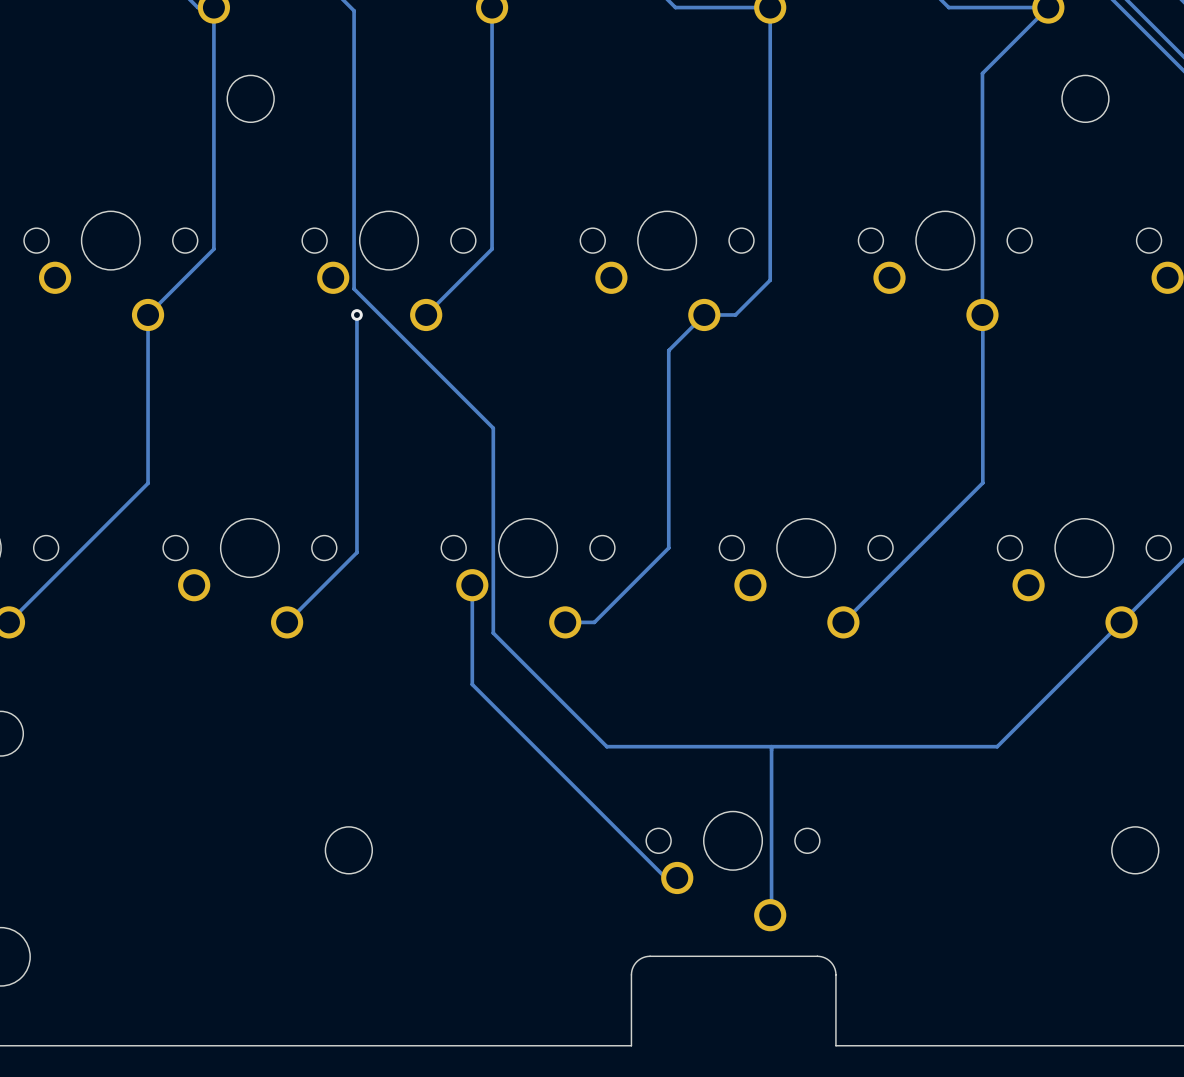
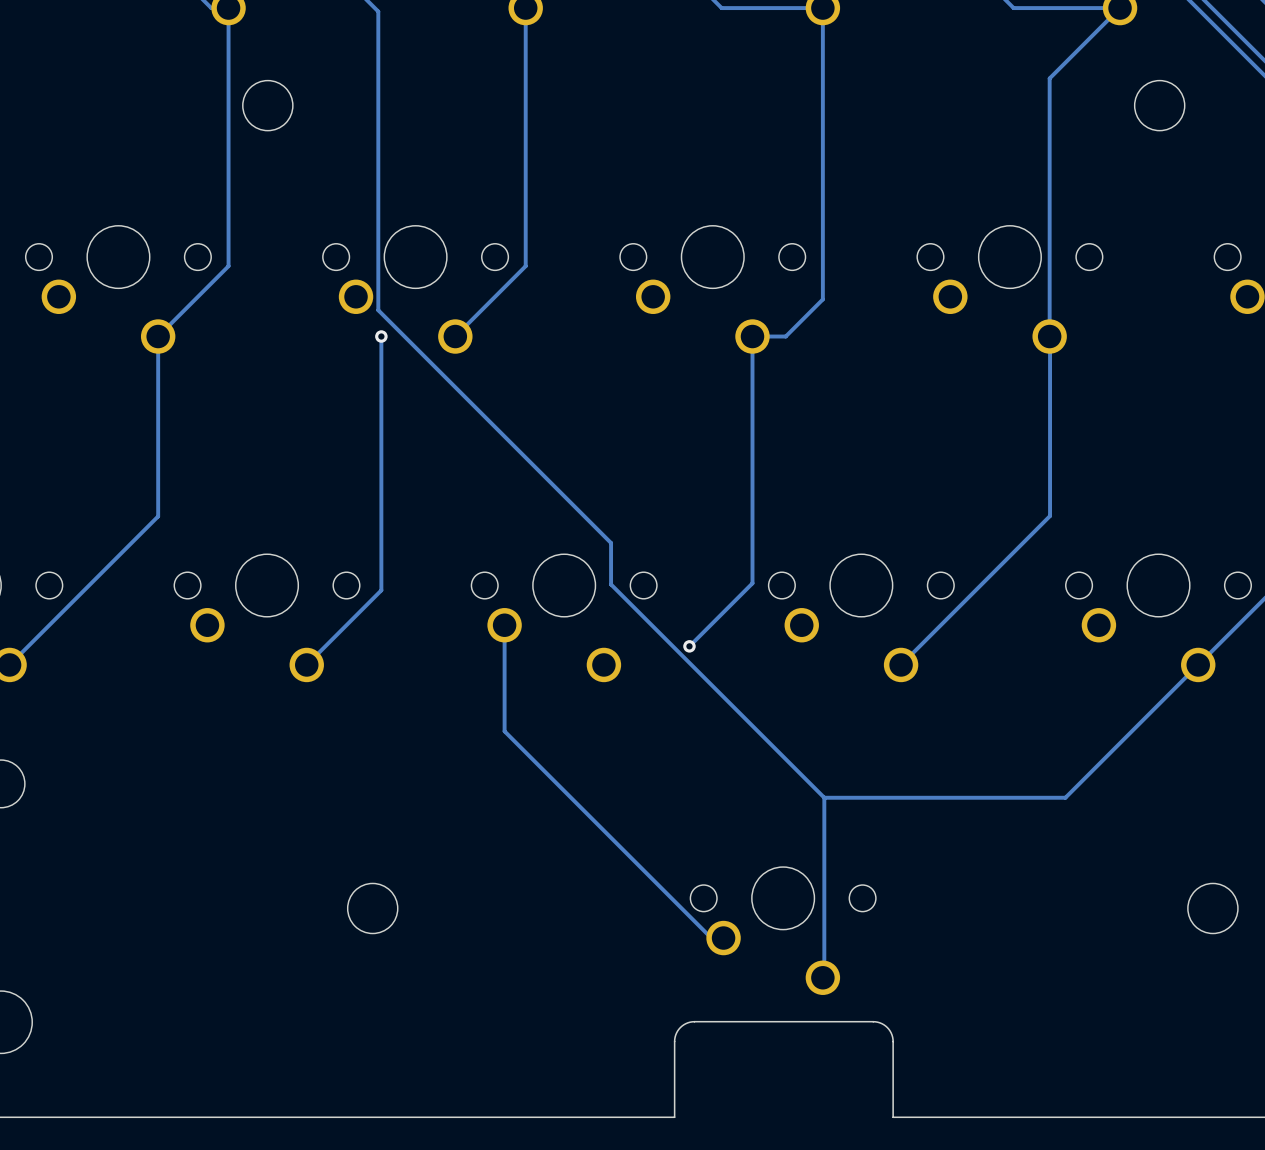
track: (354, 288) (493, 428) (493, 633) (606, 746) (771, 746) -> (378, 308) (611, 543) (611, 584) (824, 797)
track: (704, 314) (668, 350) (668, 548) (594, 622) (565, 622) -> (752, 336) (752, 583) (689, 646)
via: none -> (689, 646)

